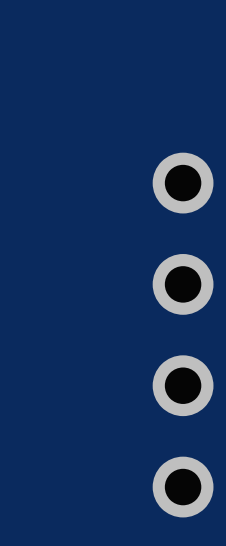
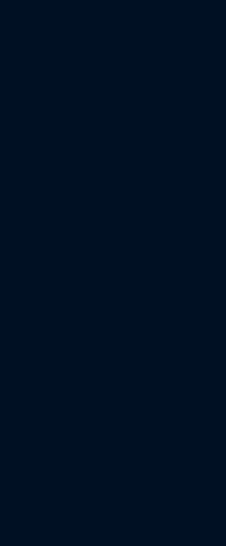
via: (183, 183) -> none
via: (183, 284) -> none
via: (183, 385) -> none
via: (183, 487) -> none

